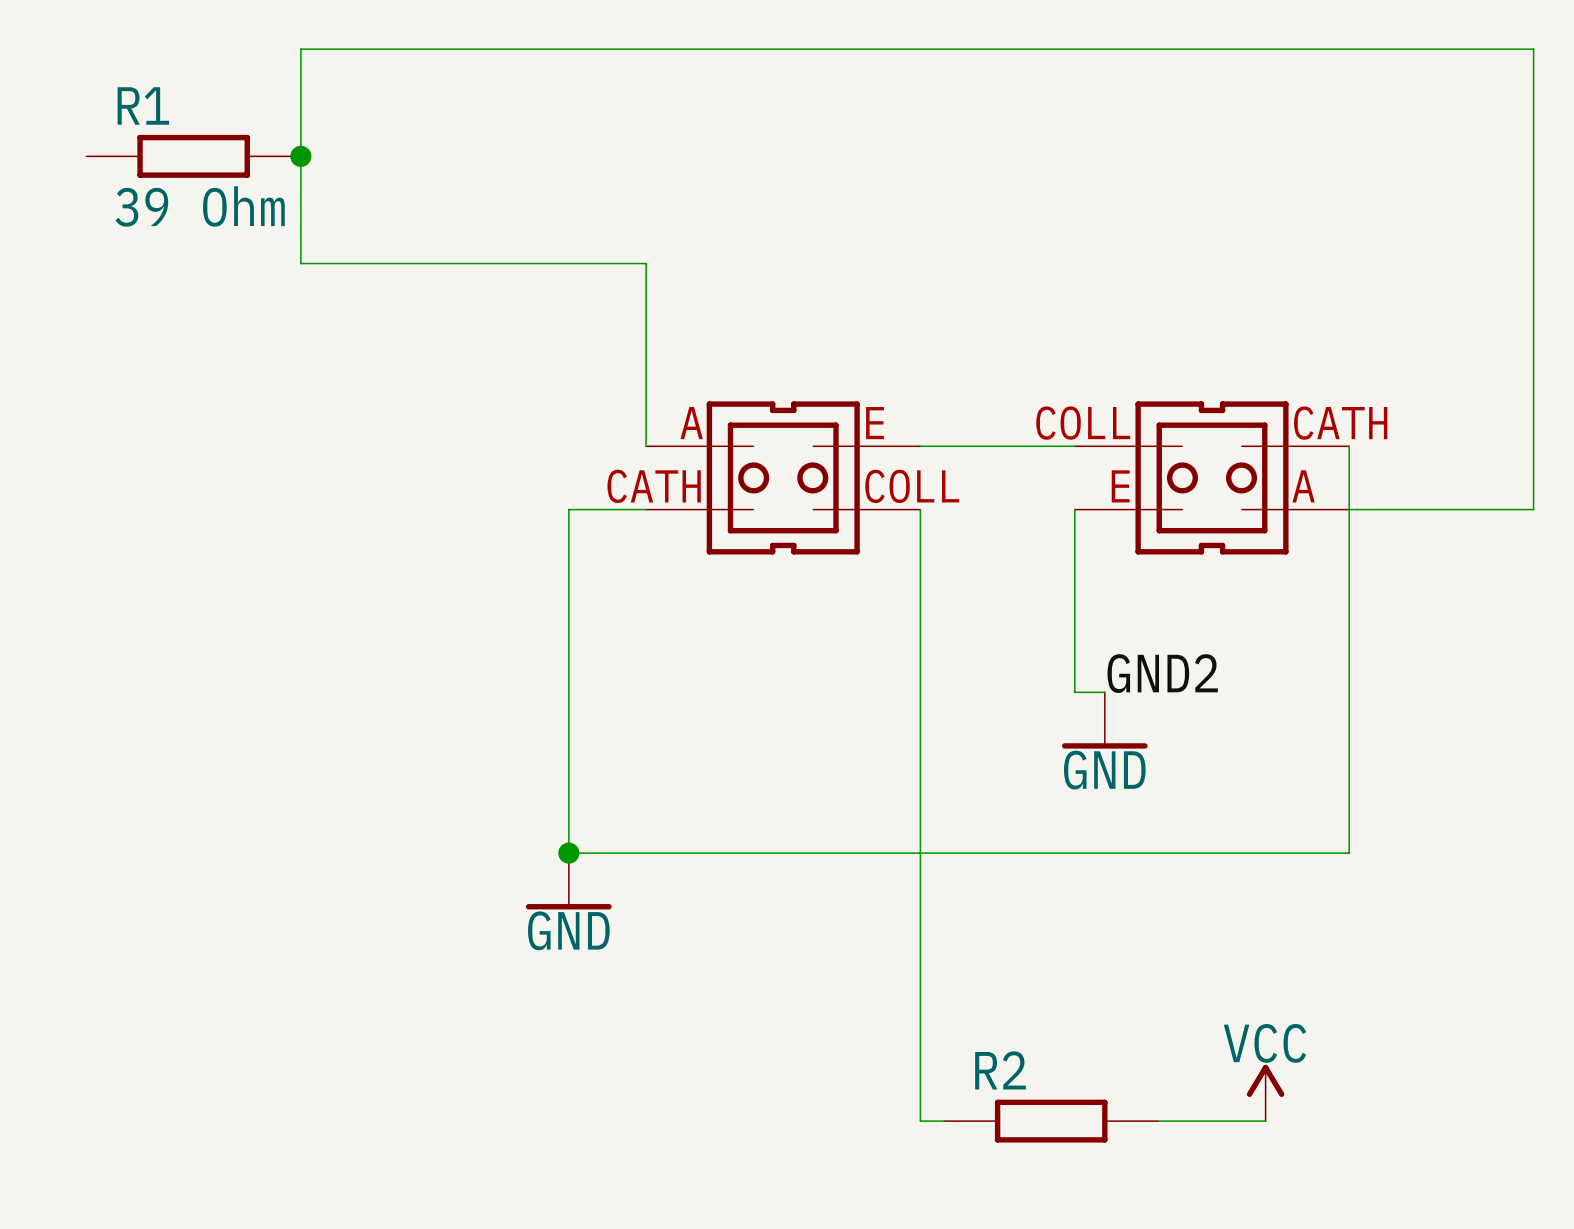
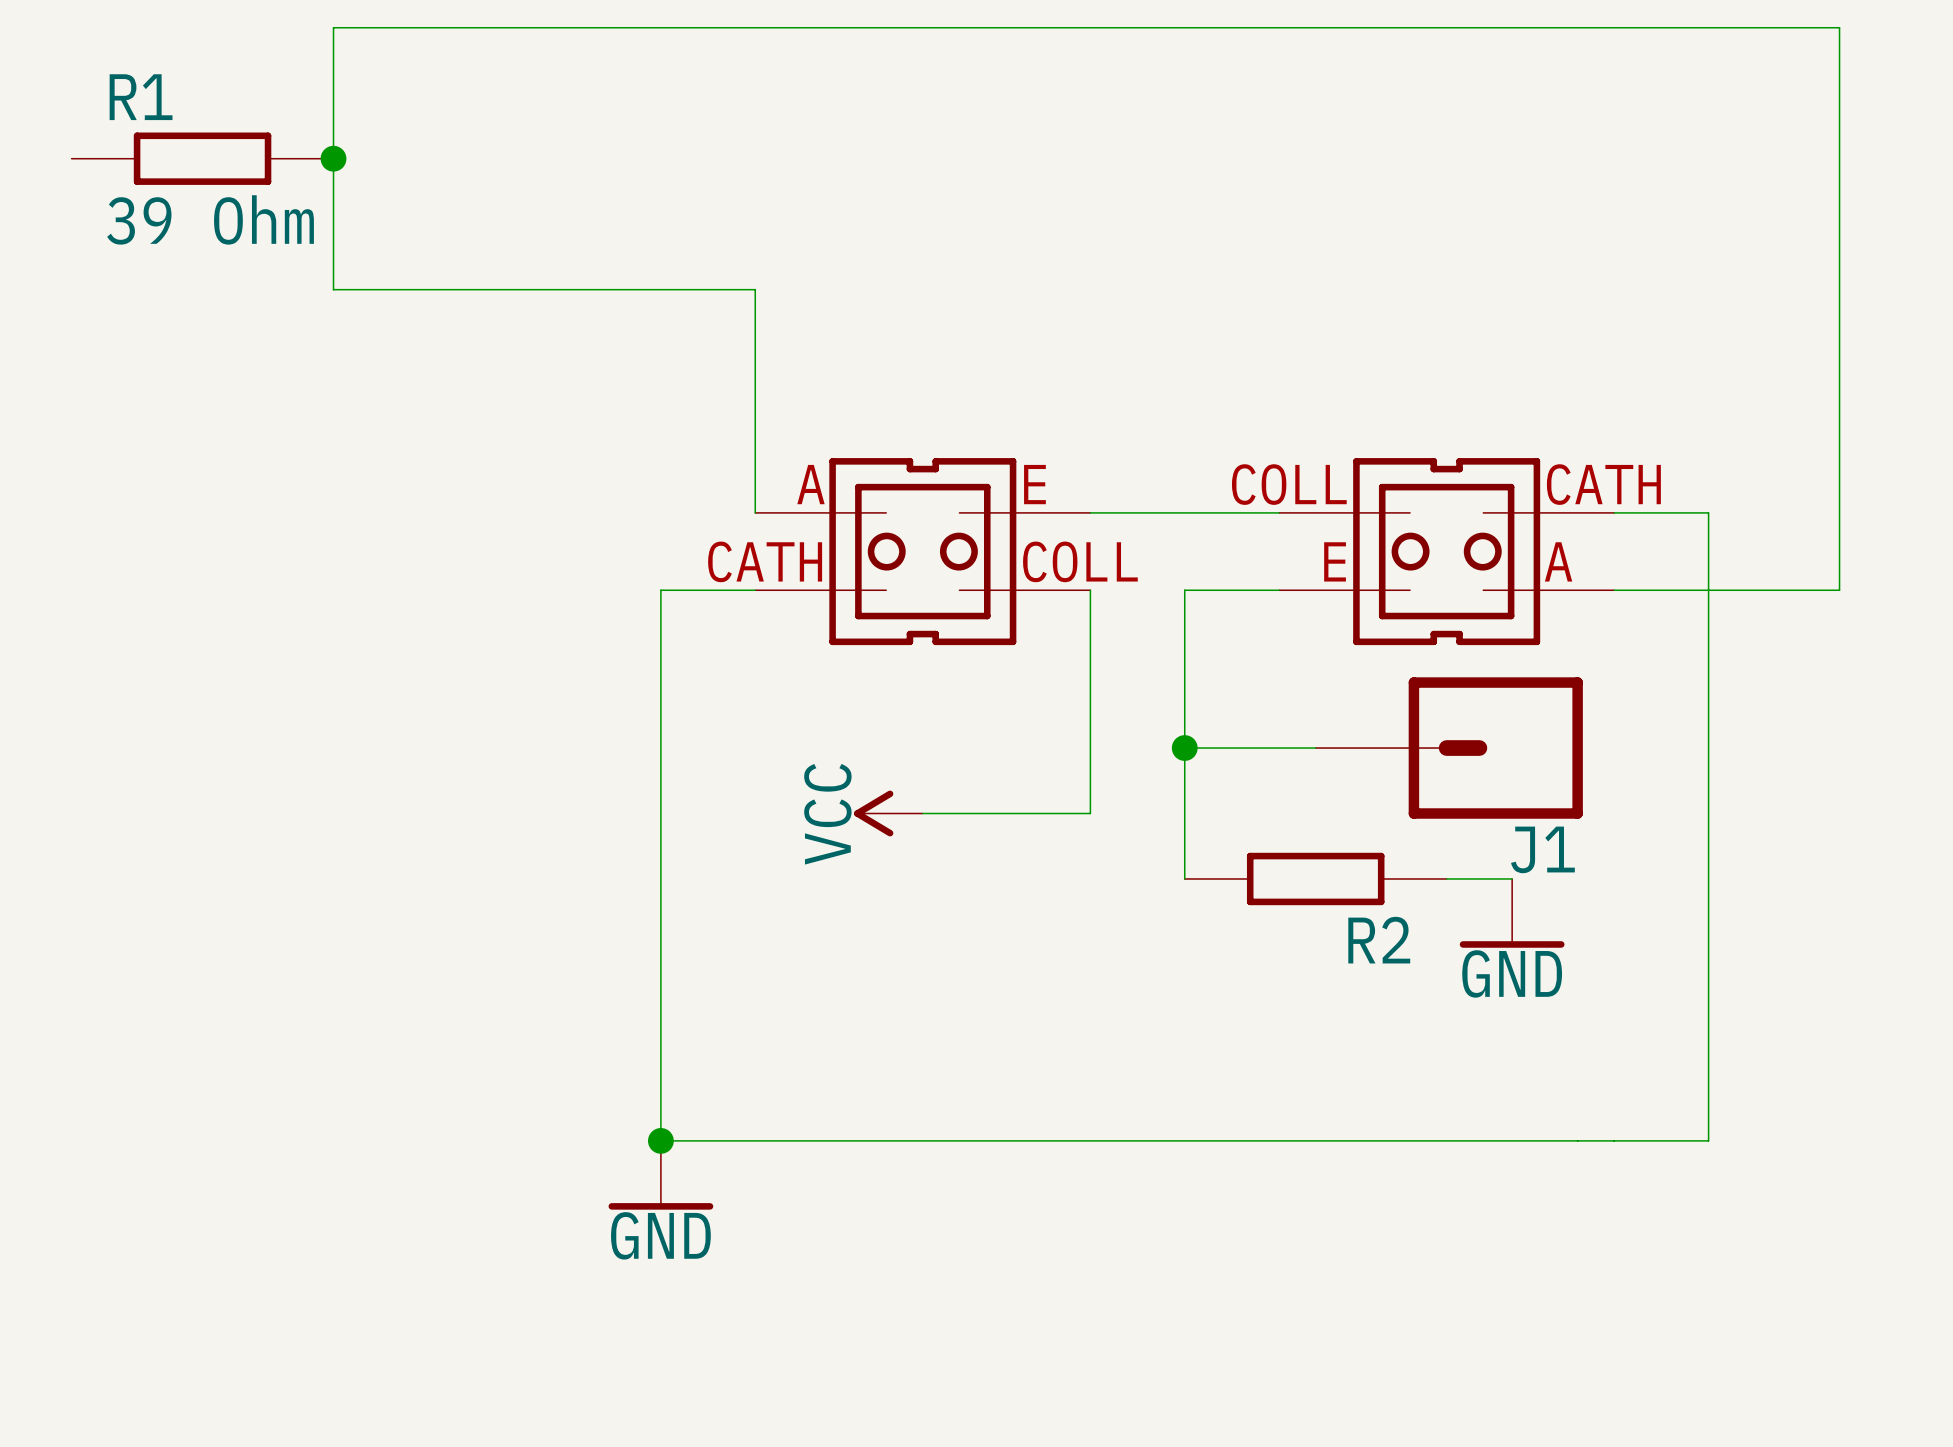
wire: (1349, 446) (1349, 853) (568, 853) -> (1614, 512) (1708, 512) (1708, 1140) (660, 1140) (660, 1009)
wire: (1074, 509) (1074, 692) (1104, 692) -> (1279, 590) (1184, 590) (1184, 878)
junction: none -> (1184, 748)
J1: none -> (1449, 748)
label: GND2 (1162, 673) -> none
power symbol: none -> VCC (888, 813)
wire: (920, 692) (920, 1121) (944, 1121) -> (1090, 813) (922, 813)
power symbol position: GND (1104, 720) -> GND (1512, 913)
wire: none -> (1446, 878) (1512, 878)
junction position: (568, 853) -> (660, 1140)
power symbol position: GND (568, 881) -> GND (660, 1175)
R2 name position: R2 (1000, 1070) -> R2 (1379, 940)
power symbol: VCC (1265, 1092) -> none
R2 position: (1051, 1121) -> (1315, 878)
wire: (1158, 1121) (1265, 1121) -> (1184, 748) (1315, 748)

